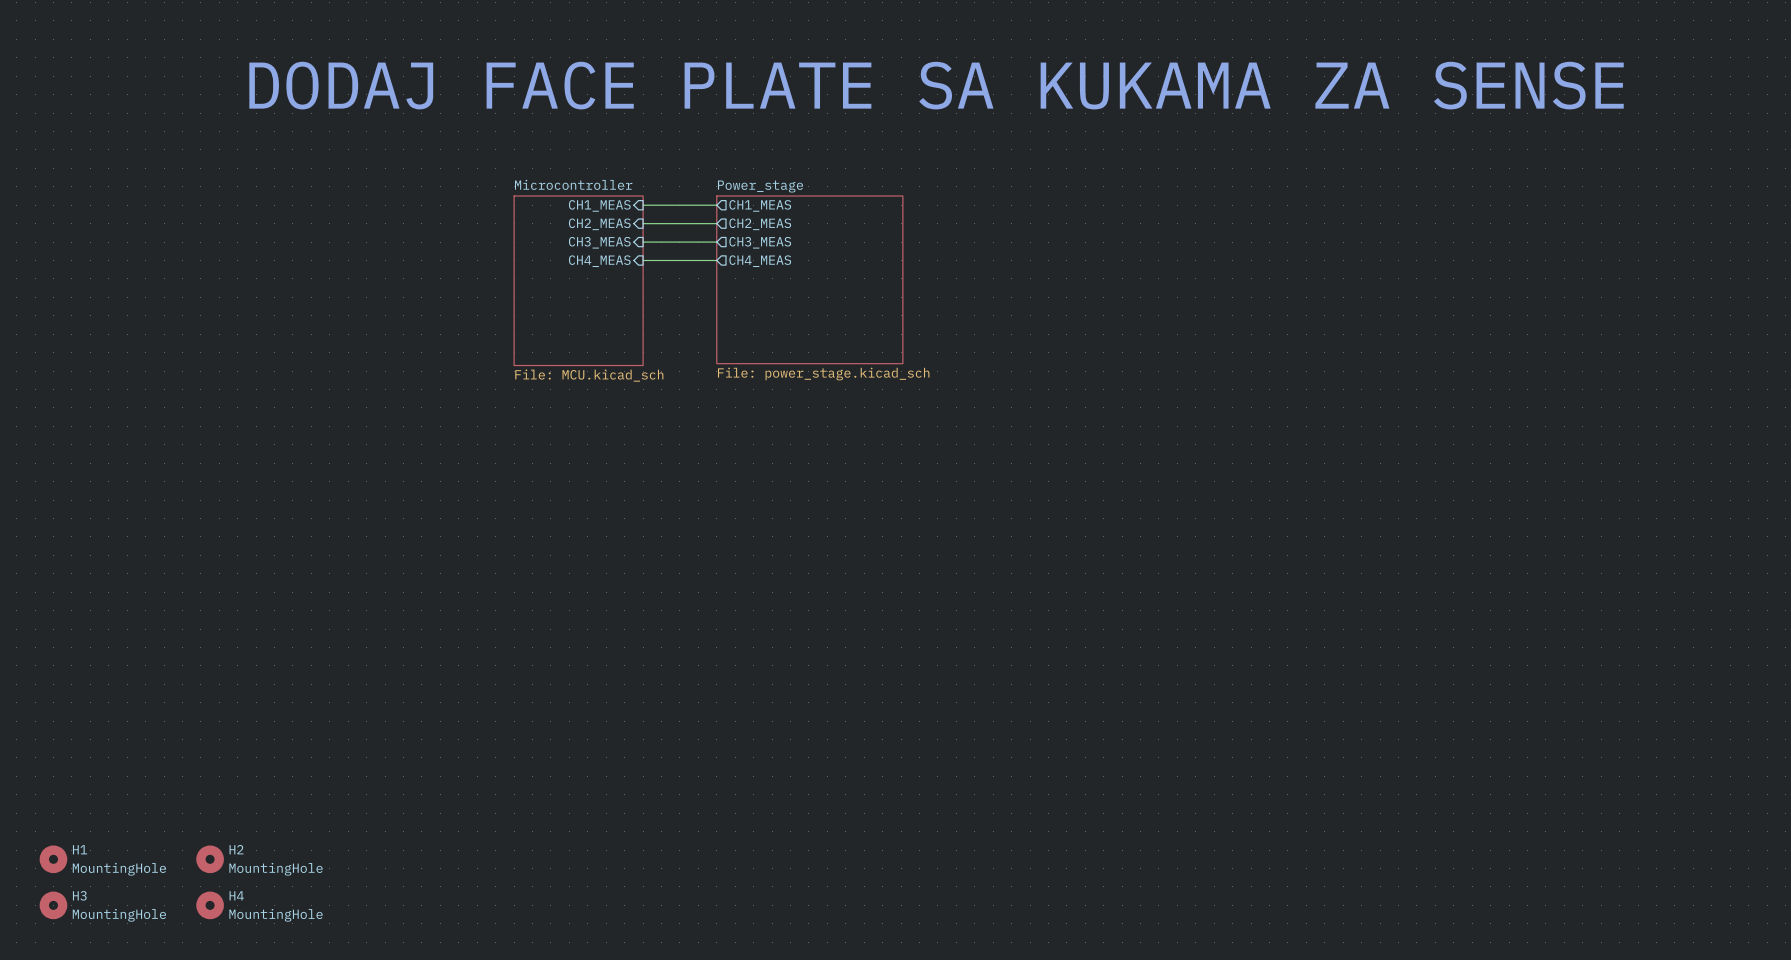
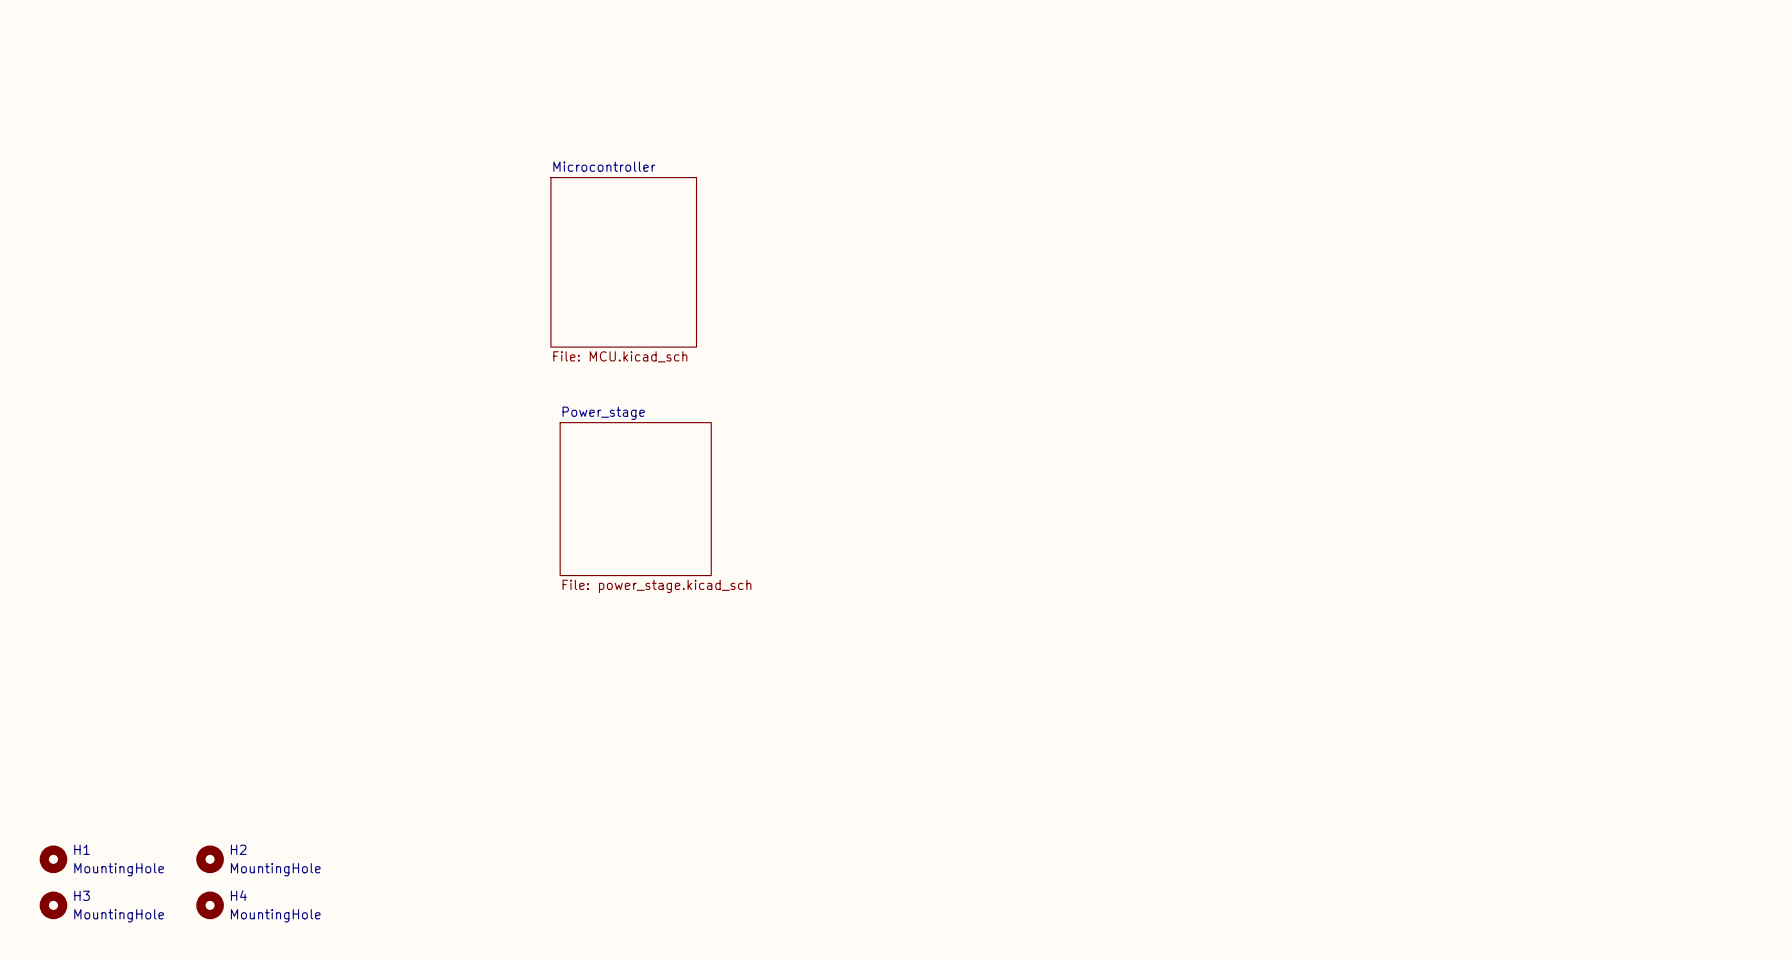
text: DODAJ FACE PLATE SA KUKAMA ZA SENSE (936, 85) -> none
sheet pin: CH1_MEAS (599, 205) -> none
wire: (643, 205) (716, 205) -> none
sheet pin: CH1_MEAS (760, 205) -> none
wire: (643, 223) (716, 223) -> none
sheet pin: CH2_MEAS (599, 224) -> none
sheet pin: CH2_MEAS (760, 224) -> none
sheet pin: CH3_MEAS (599, 242) -> none
wire: (643, 242) (716, 242) -> none
sheet pin: CH3_MEAS (760, 242) -> none
wire: (643, 260) (716, 260) -> none
sheet pin: CH4_MEAS (599, 261) -> none
sheet pin: CH4_MEAS (760, 261) -> none
sheet Microcontroller: none -> File: MCU.kicad_sch (623, 262)
sheet Power_stage: File: power_stage.kicad_sch (809, 279) -> none
sheet Microcontroller: File: MCU.kicad_sch (578, 280) -> none
sheet Power_stage: none -> File: power_stage.kicad_sch (635, 499)

